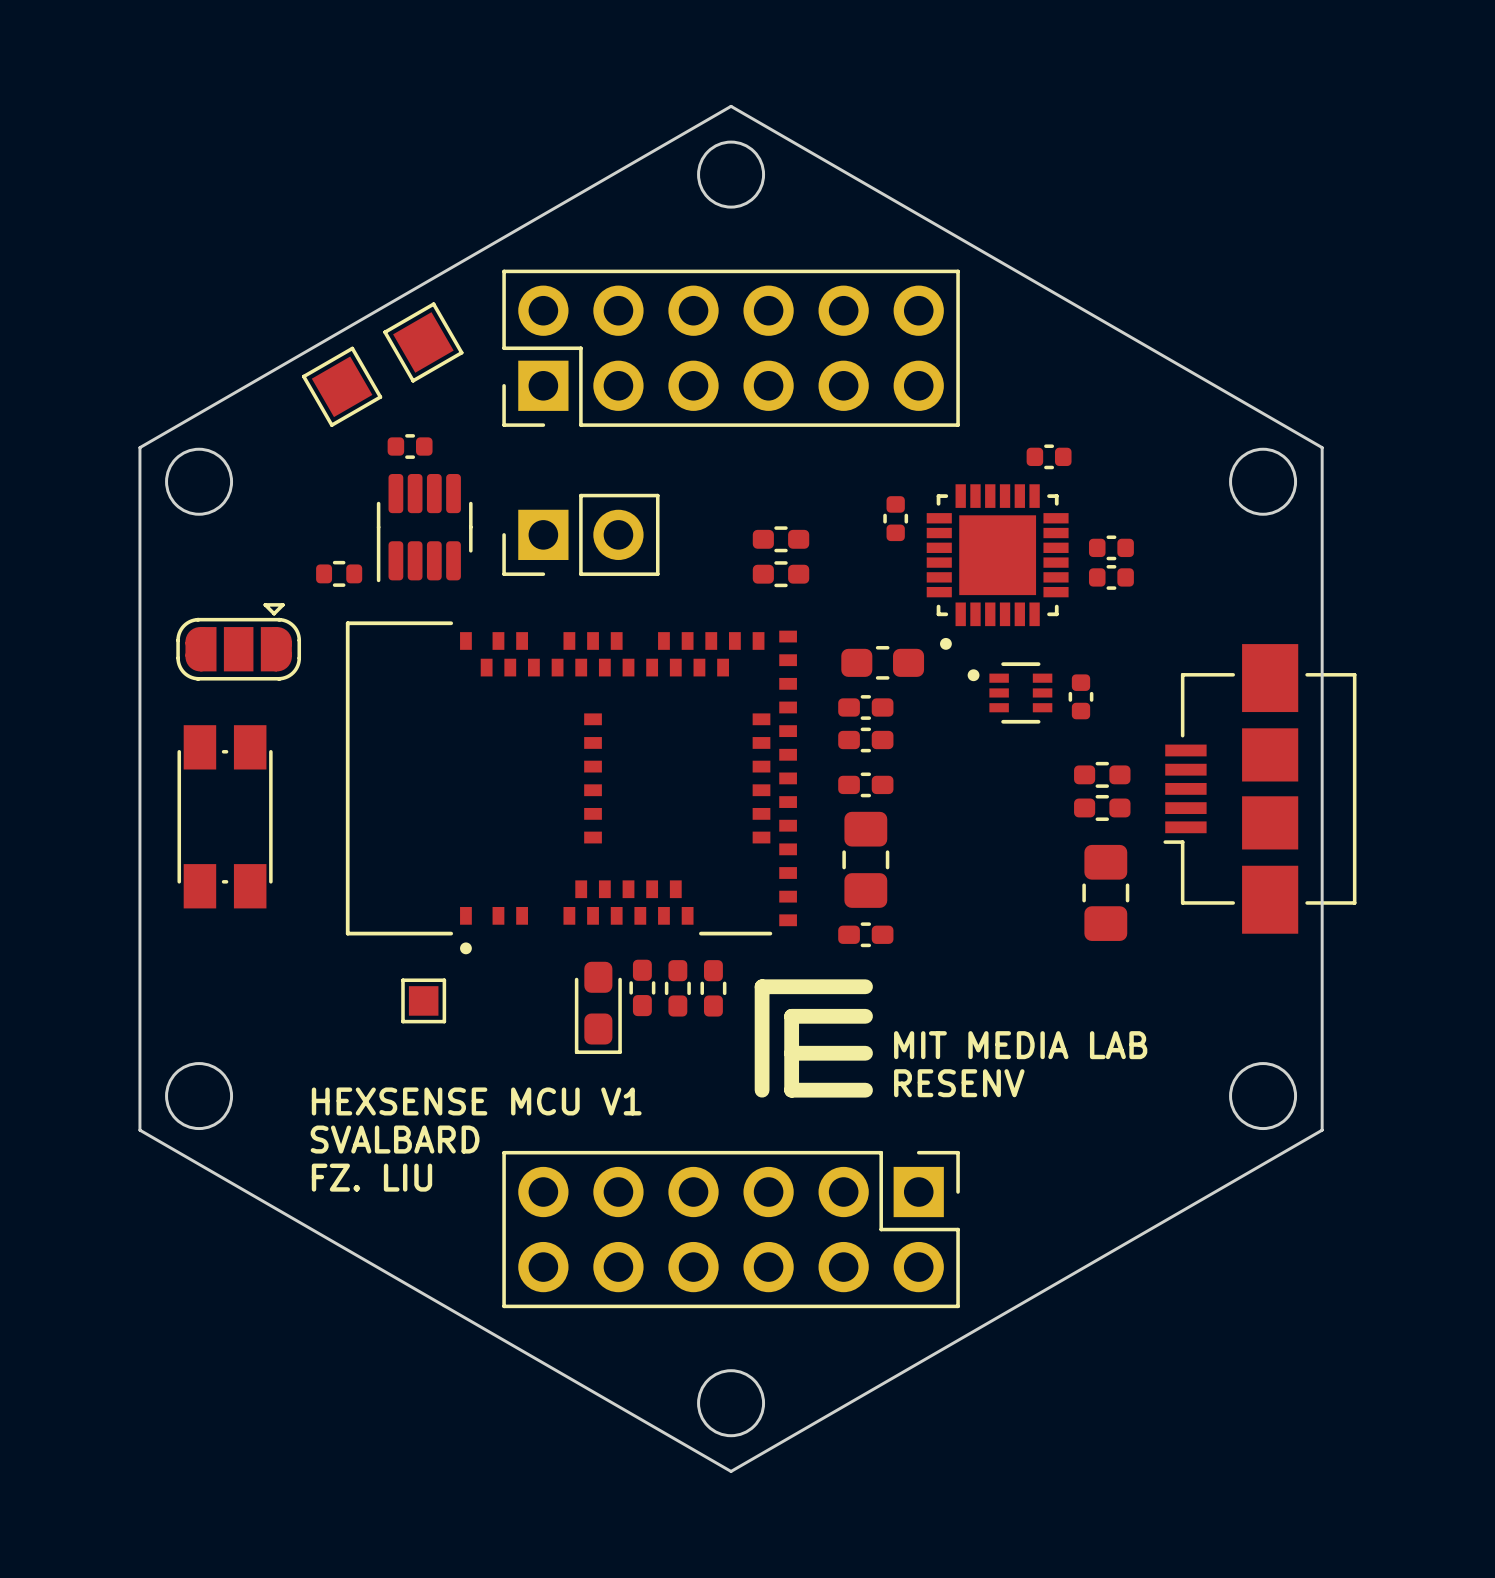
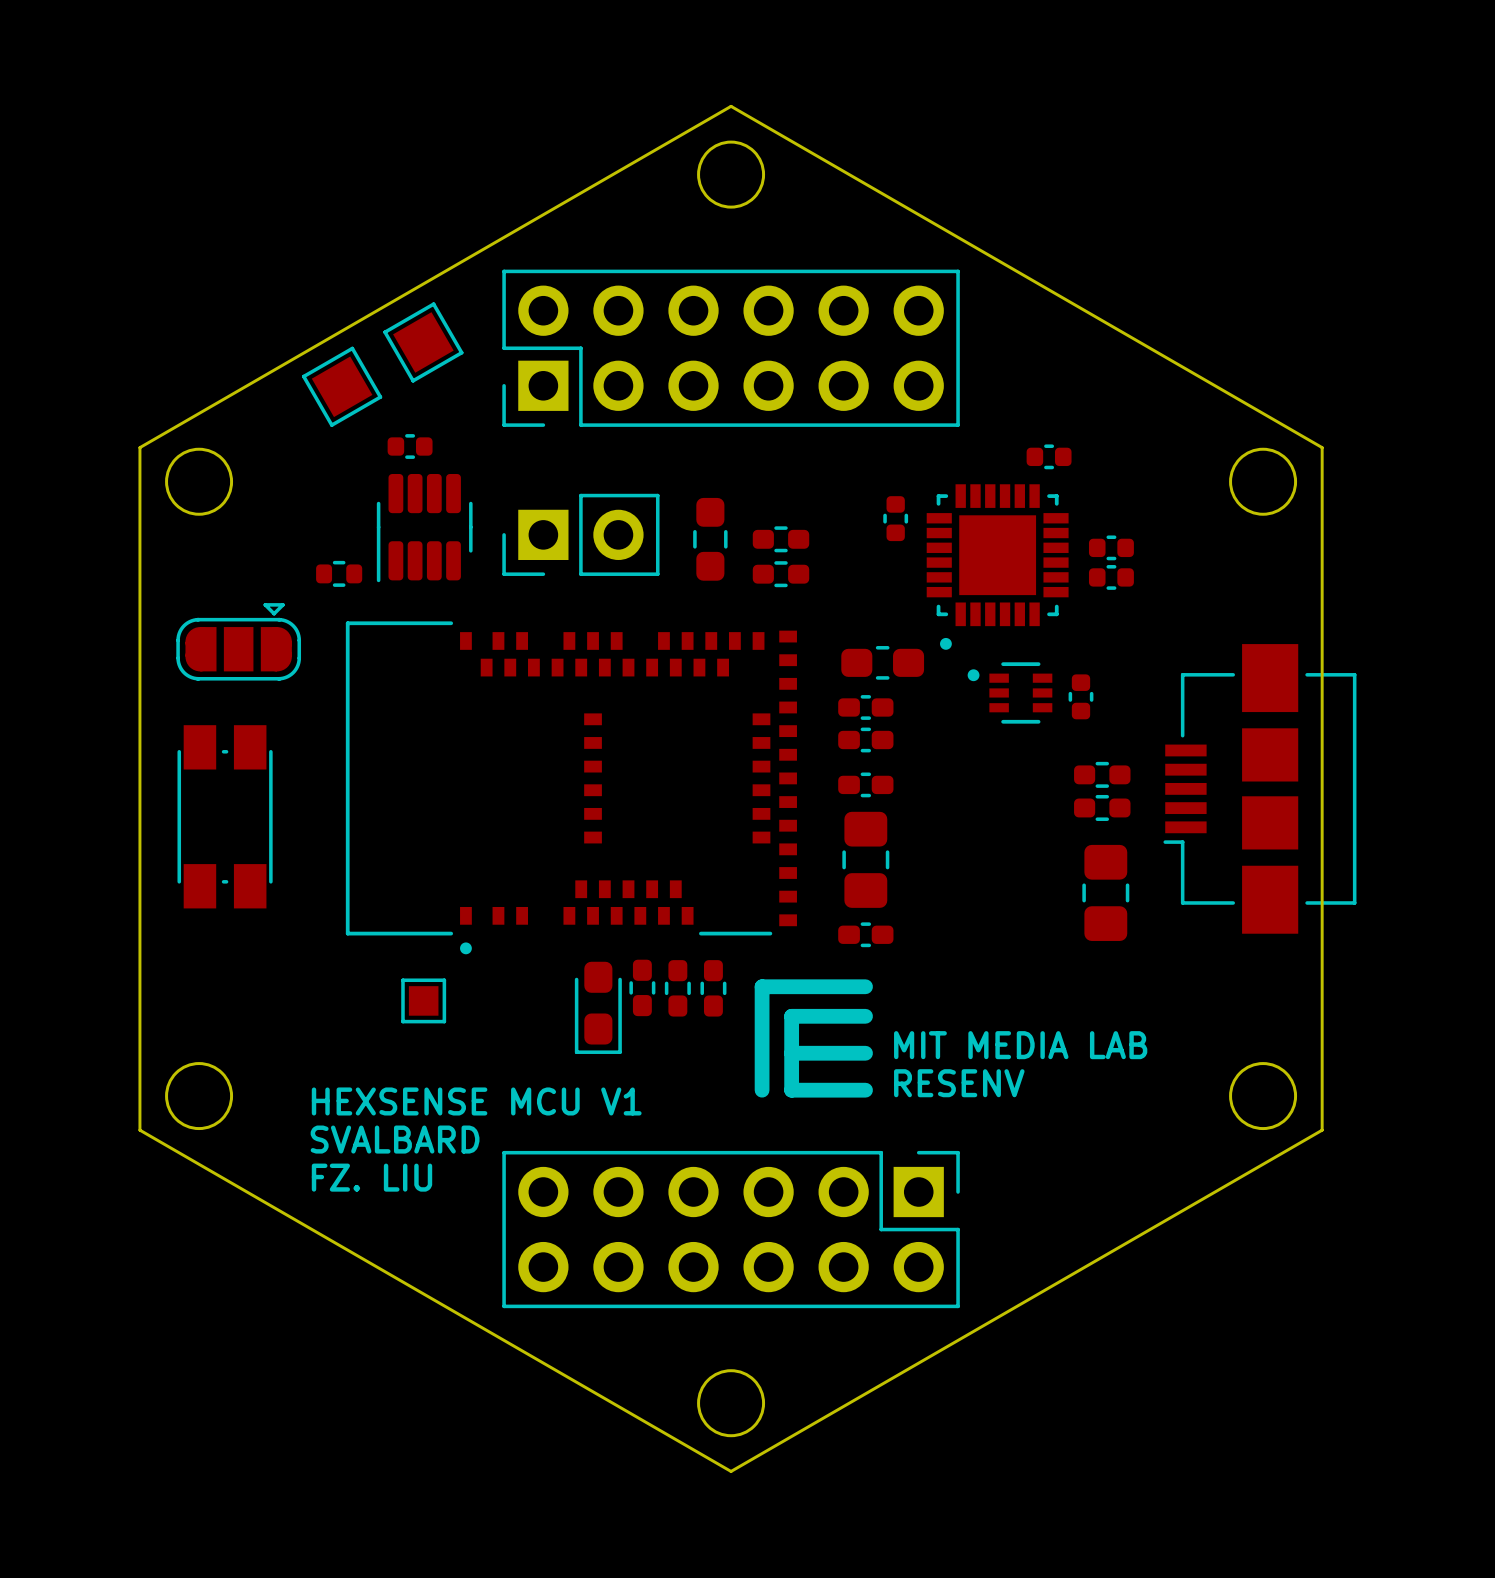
part: none -> (710, 539)

